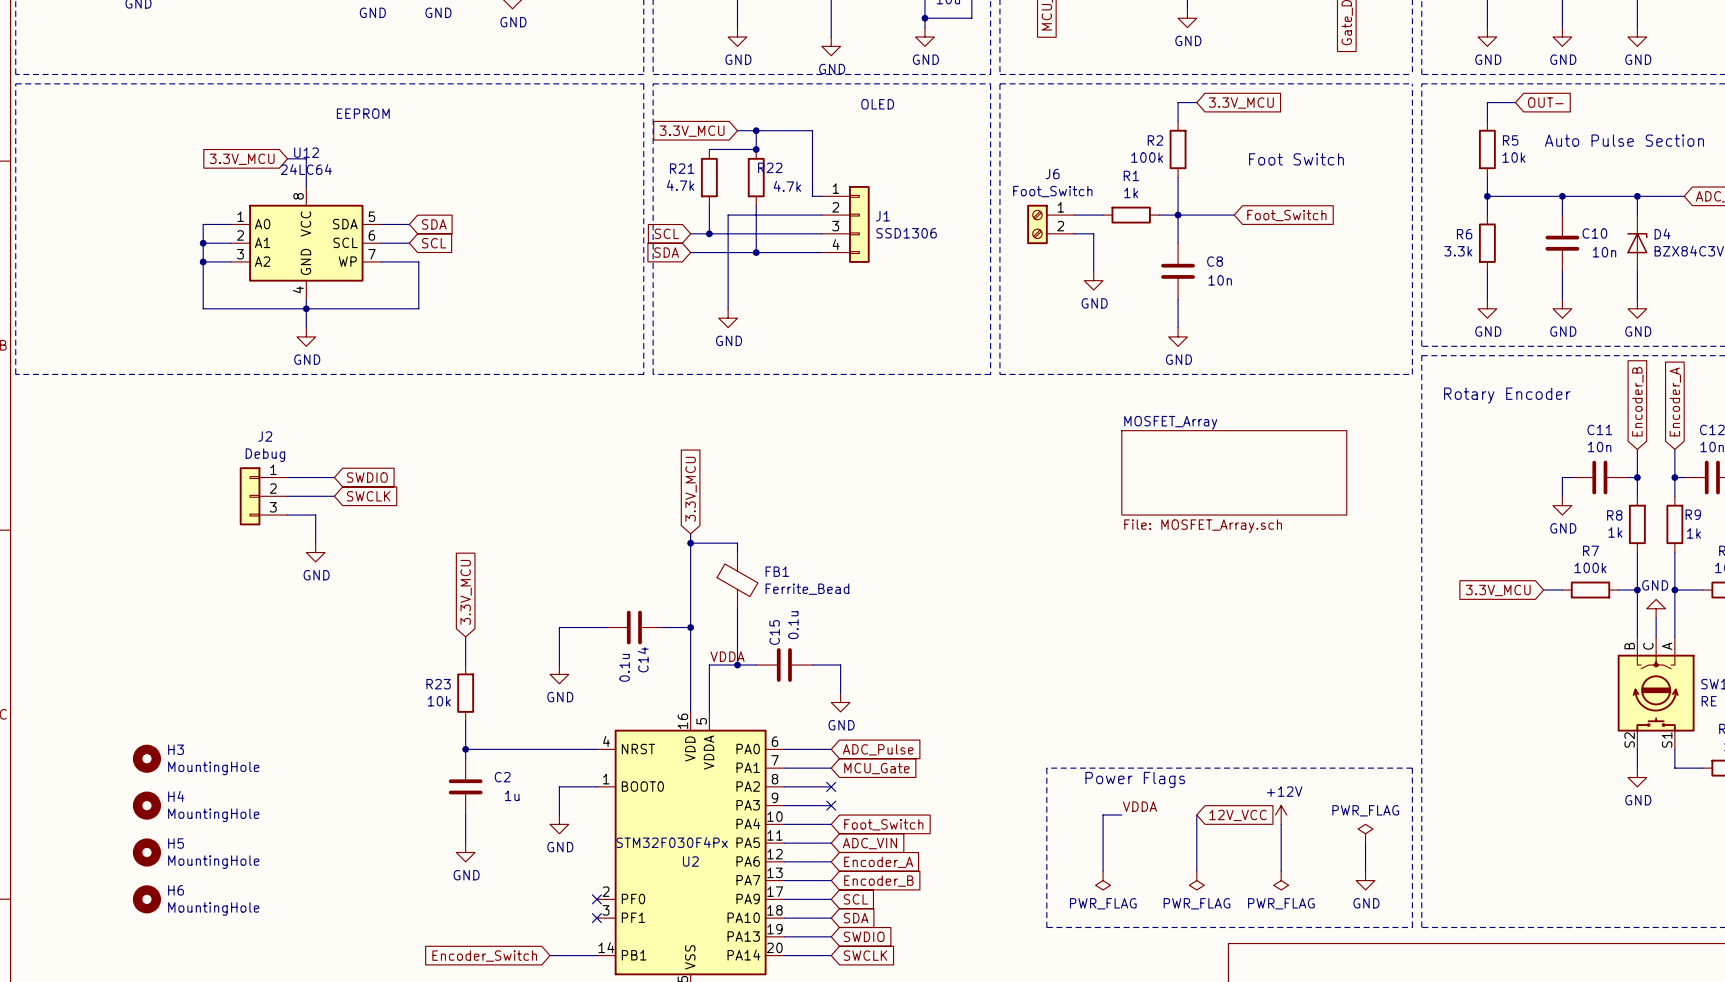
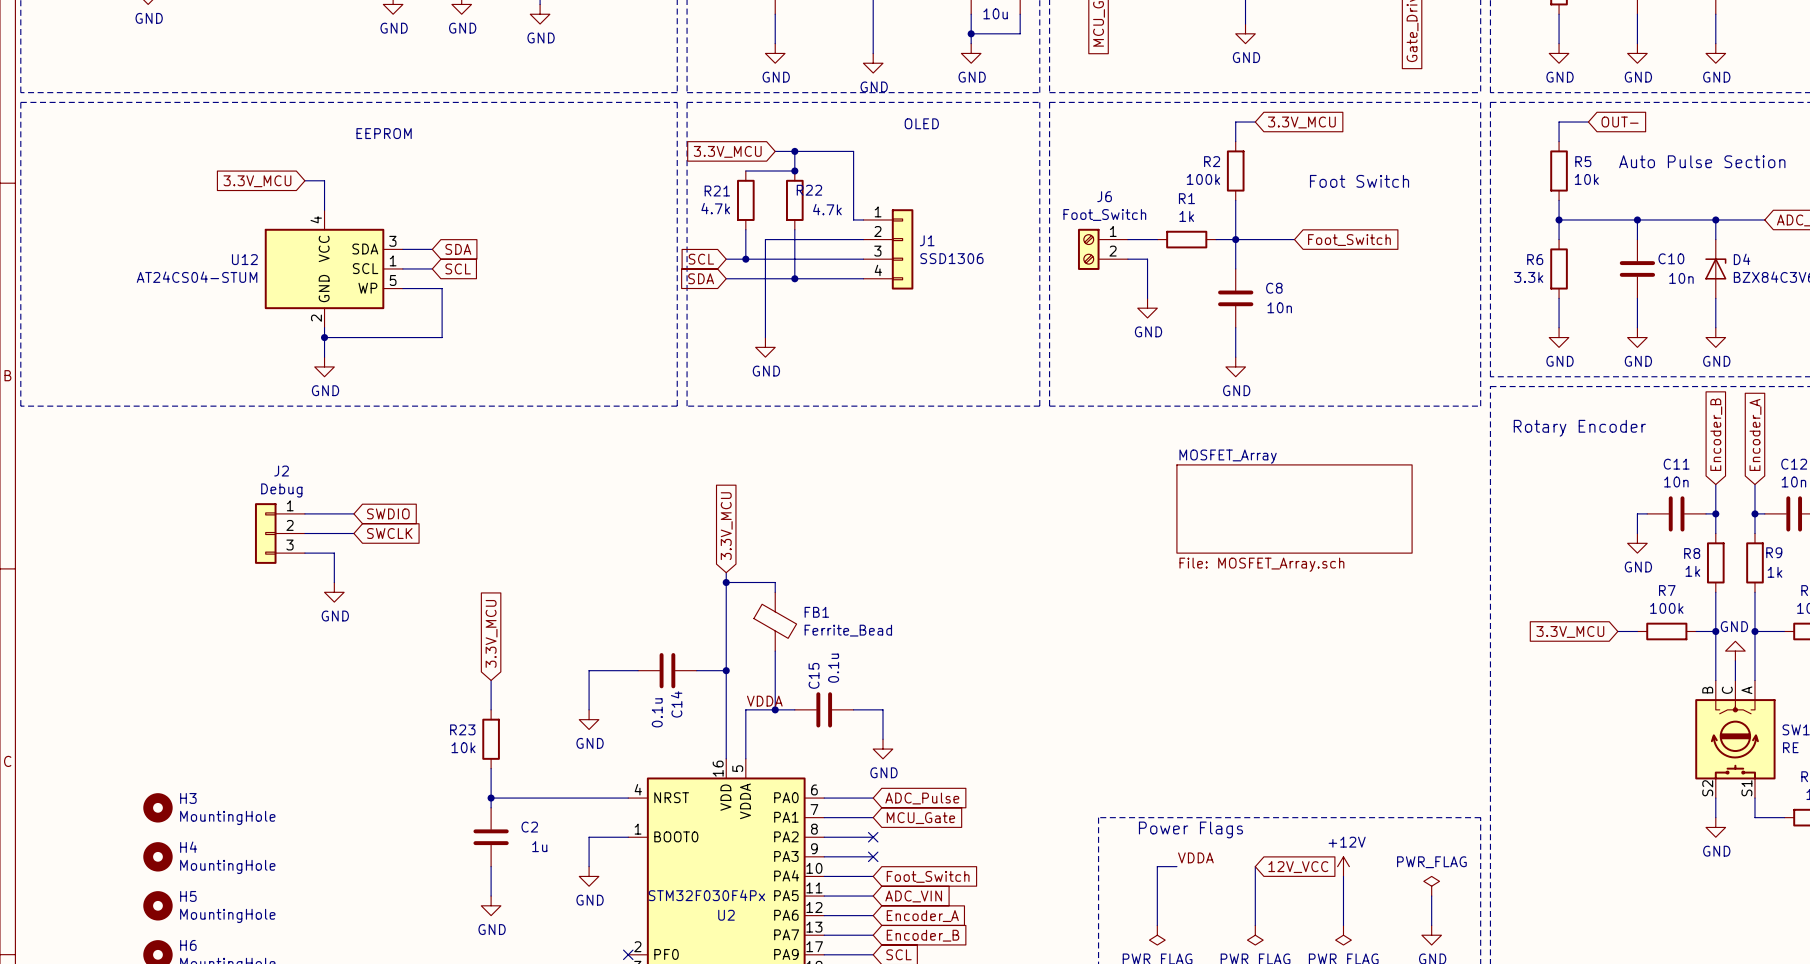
U12 name position: U12 (306, 152) -> U12 (244, 259)
U12 value: 24LC64 (306, 169) -> AT24CS04-STUM (197, 277)
U12 symbol: [231, 186, 382, 300] -> [264, 210, 403, 328]
wire: (231, 224) (203, 224) (203, 308) (306, 308) -> none
wire: (203, 243) (231, 243) -> none
junction: (203, 243) -> none
wire: (203, 261) (231, 261) -> none
junction: (203, 261) -> none

